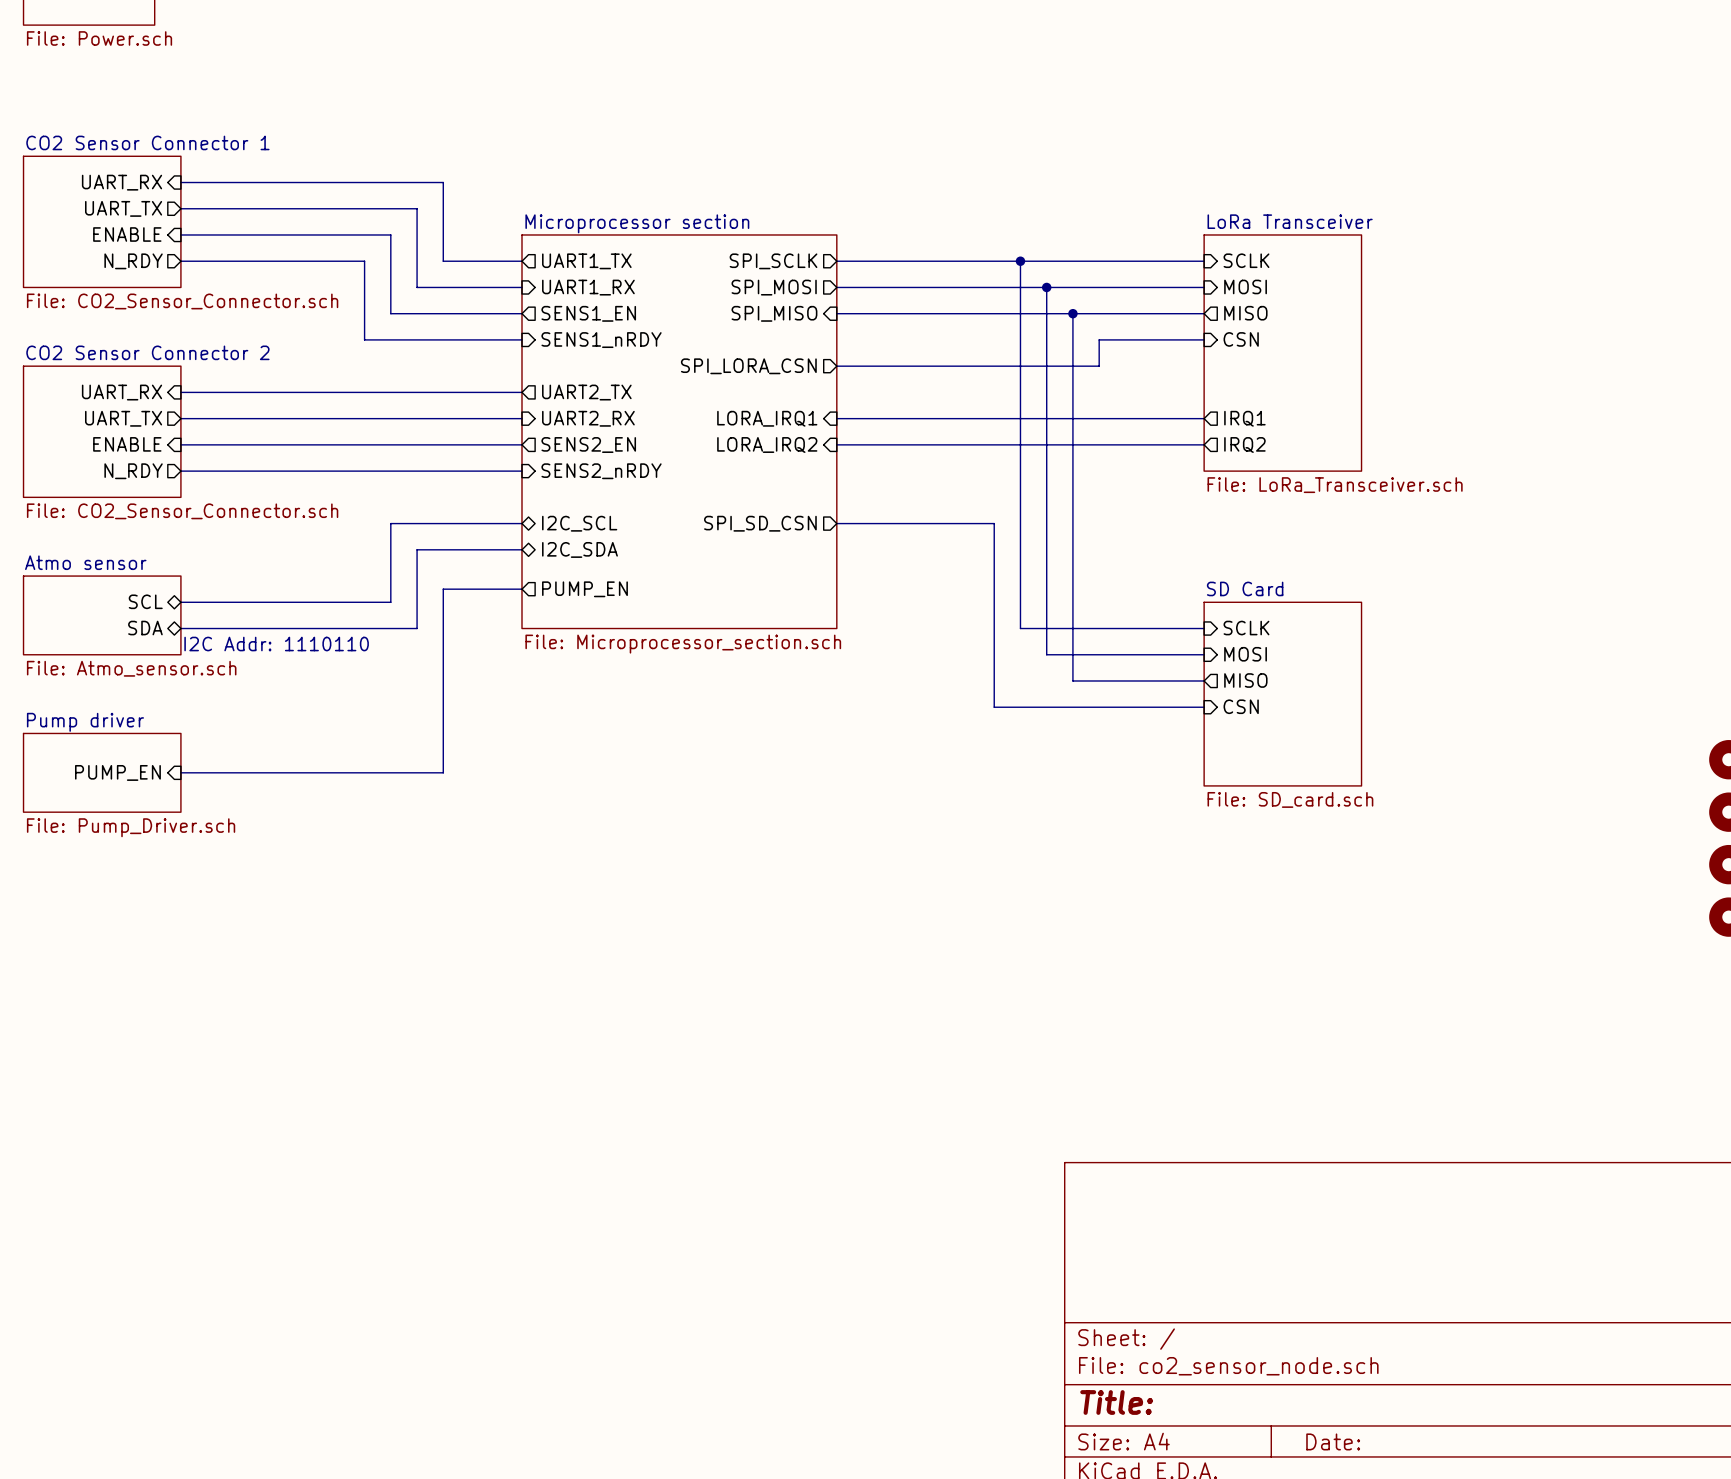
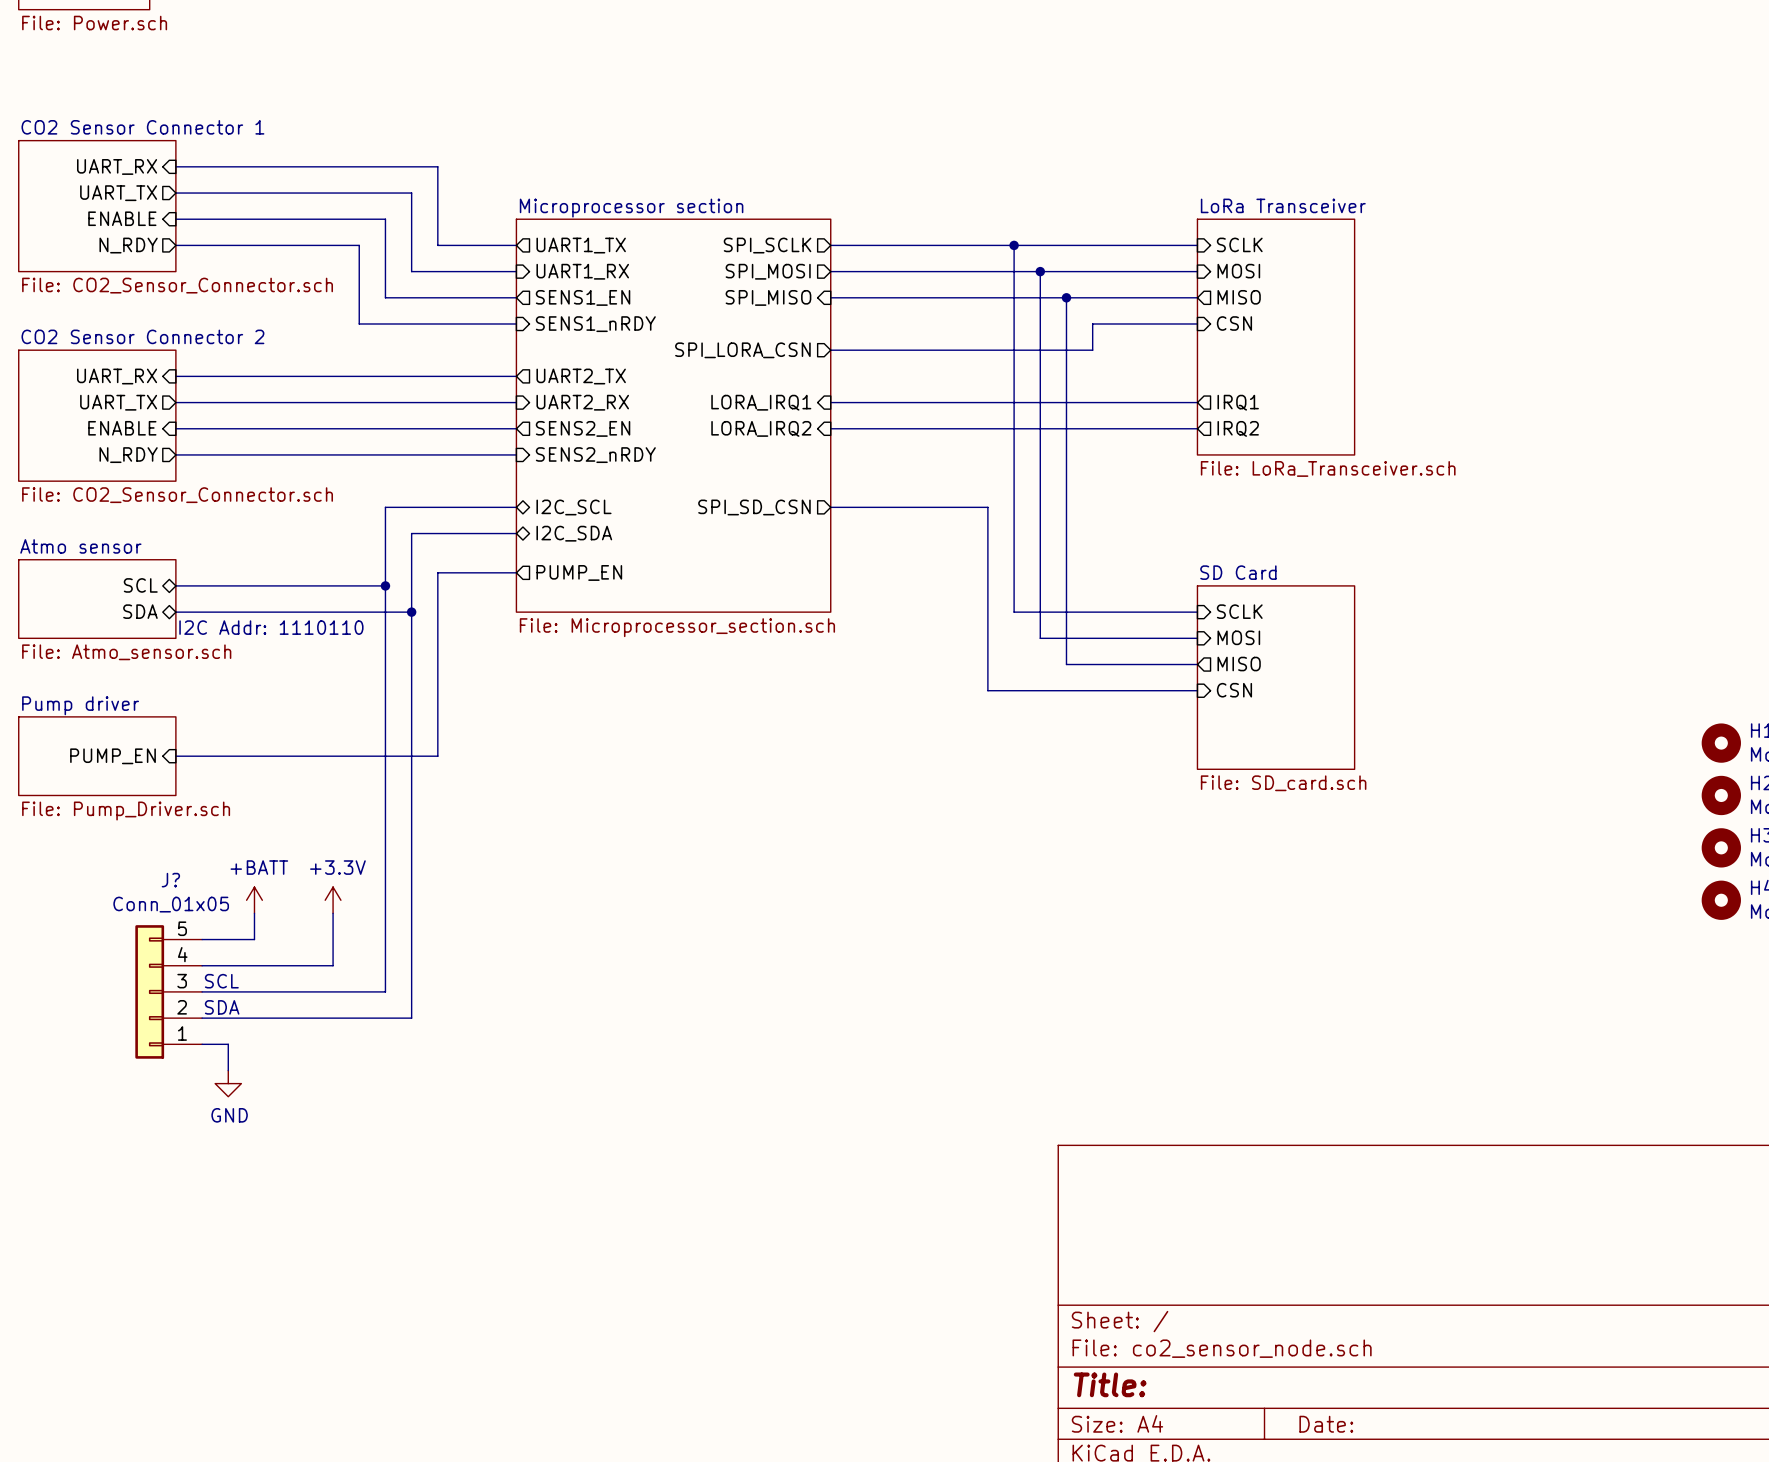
wire: none -> (385, 585) (385, 991) (202, 991)
junction: none -> (385, 585)
wire: none -> (411, 612) (411, 1018) (202, 1018)
junction: none -> (411, 612)
power symbol: none -> +BATT (254, 900)
power symbol: none -> +3.3V (333, 900)
wire: none -> (254, 913) (254, 939) (202, 939)
wire: none -> (333, 913) (333, 965) (202, 965)
text: none -> SCL (221, 981)
J?: none -> Conn_01x05 (168, 991)
text: none -> SDA (222, 1007)
wire: none -> (202, 1044) (228, 1044) (228, 1070)
power symbol: none -> GND (228, 1083)

